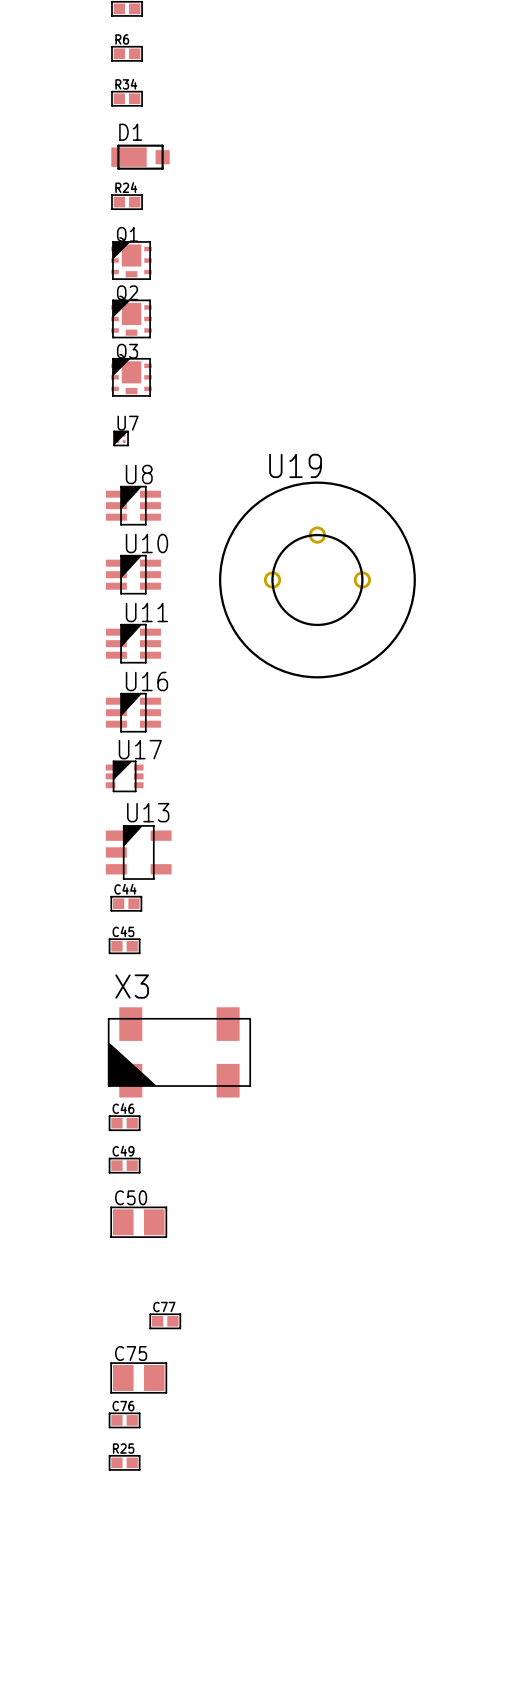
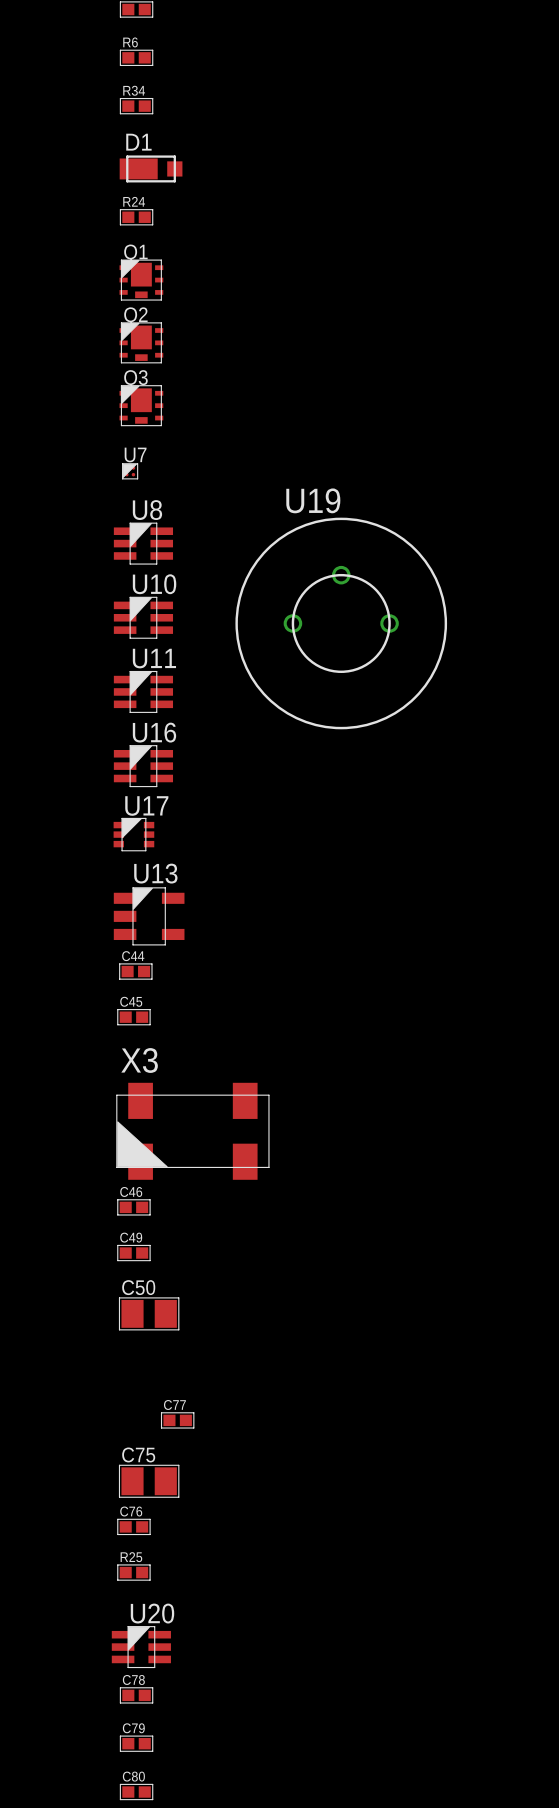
U20: none -> (141, 1647)
C78: none -> (136, 1695)
C79: none -> (136, 1743)
C80: none -> (136, 1792)

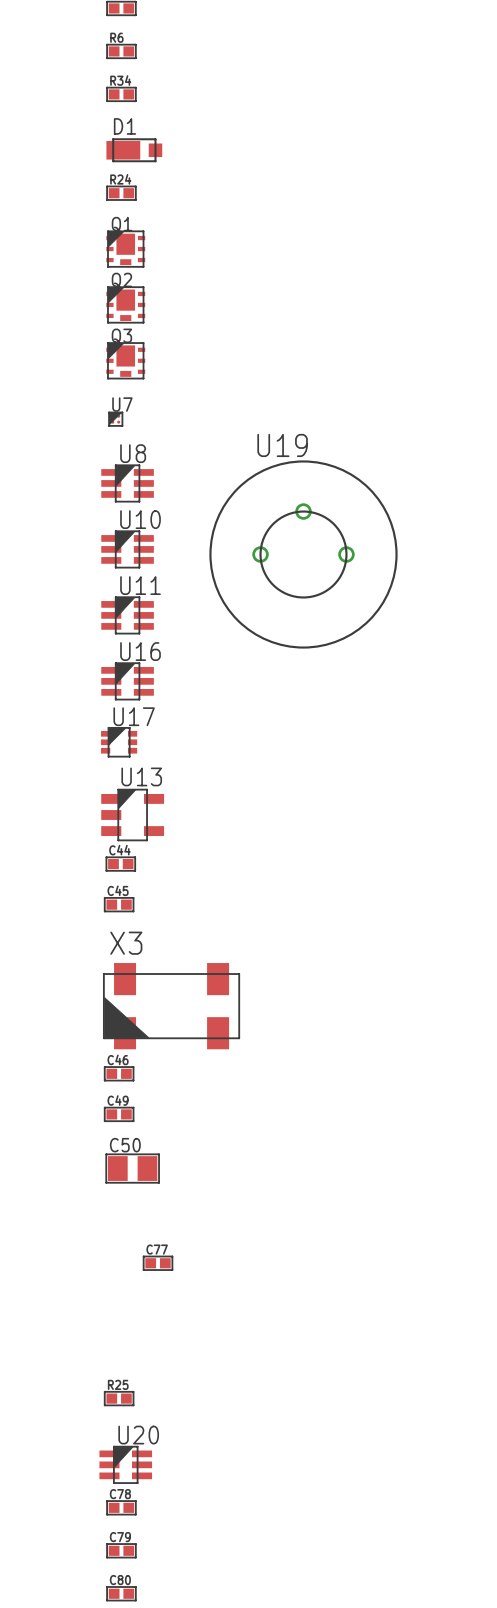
C75: (149, 1481) -> none
C76: (133, 1526) -> none

